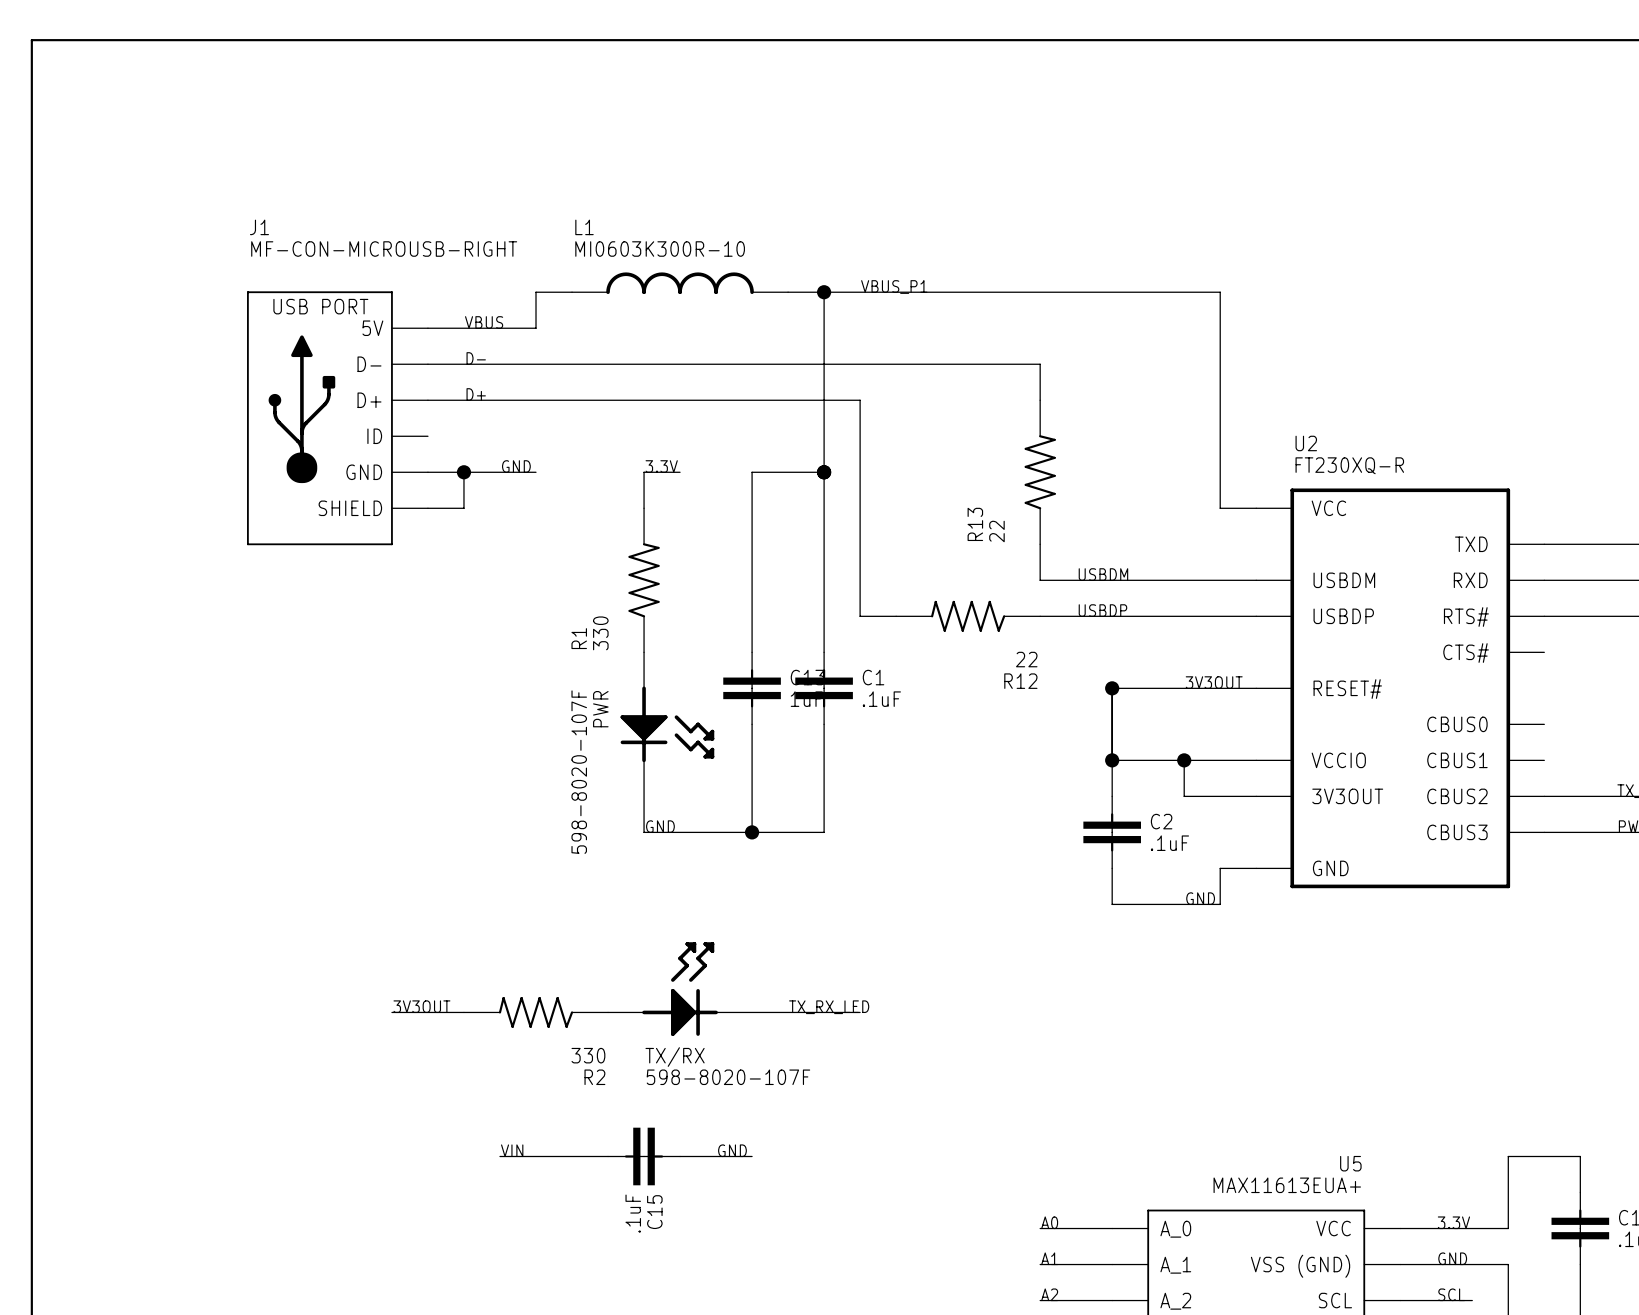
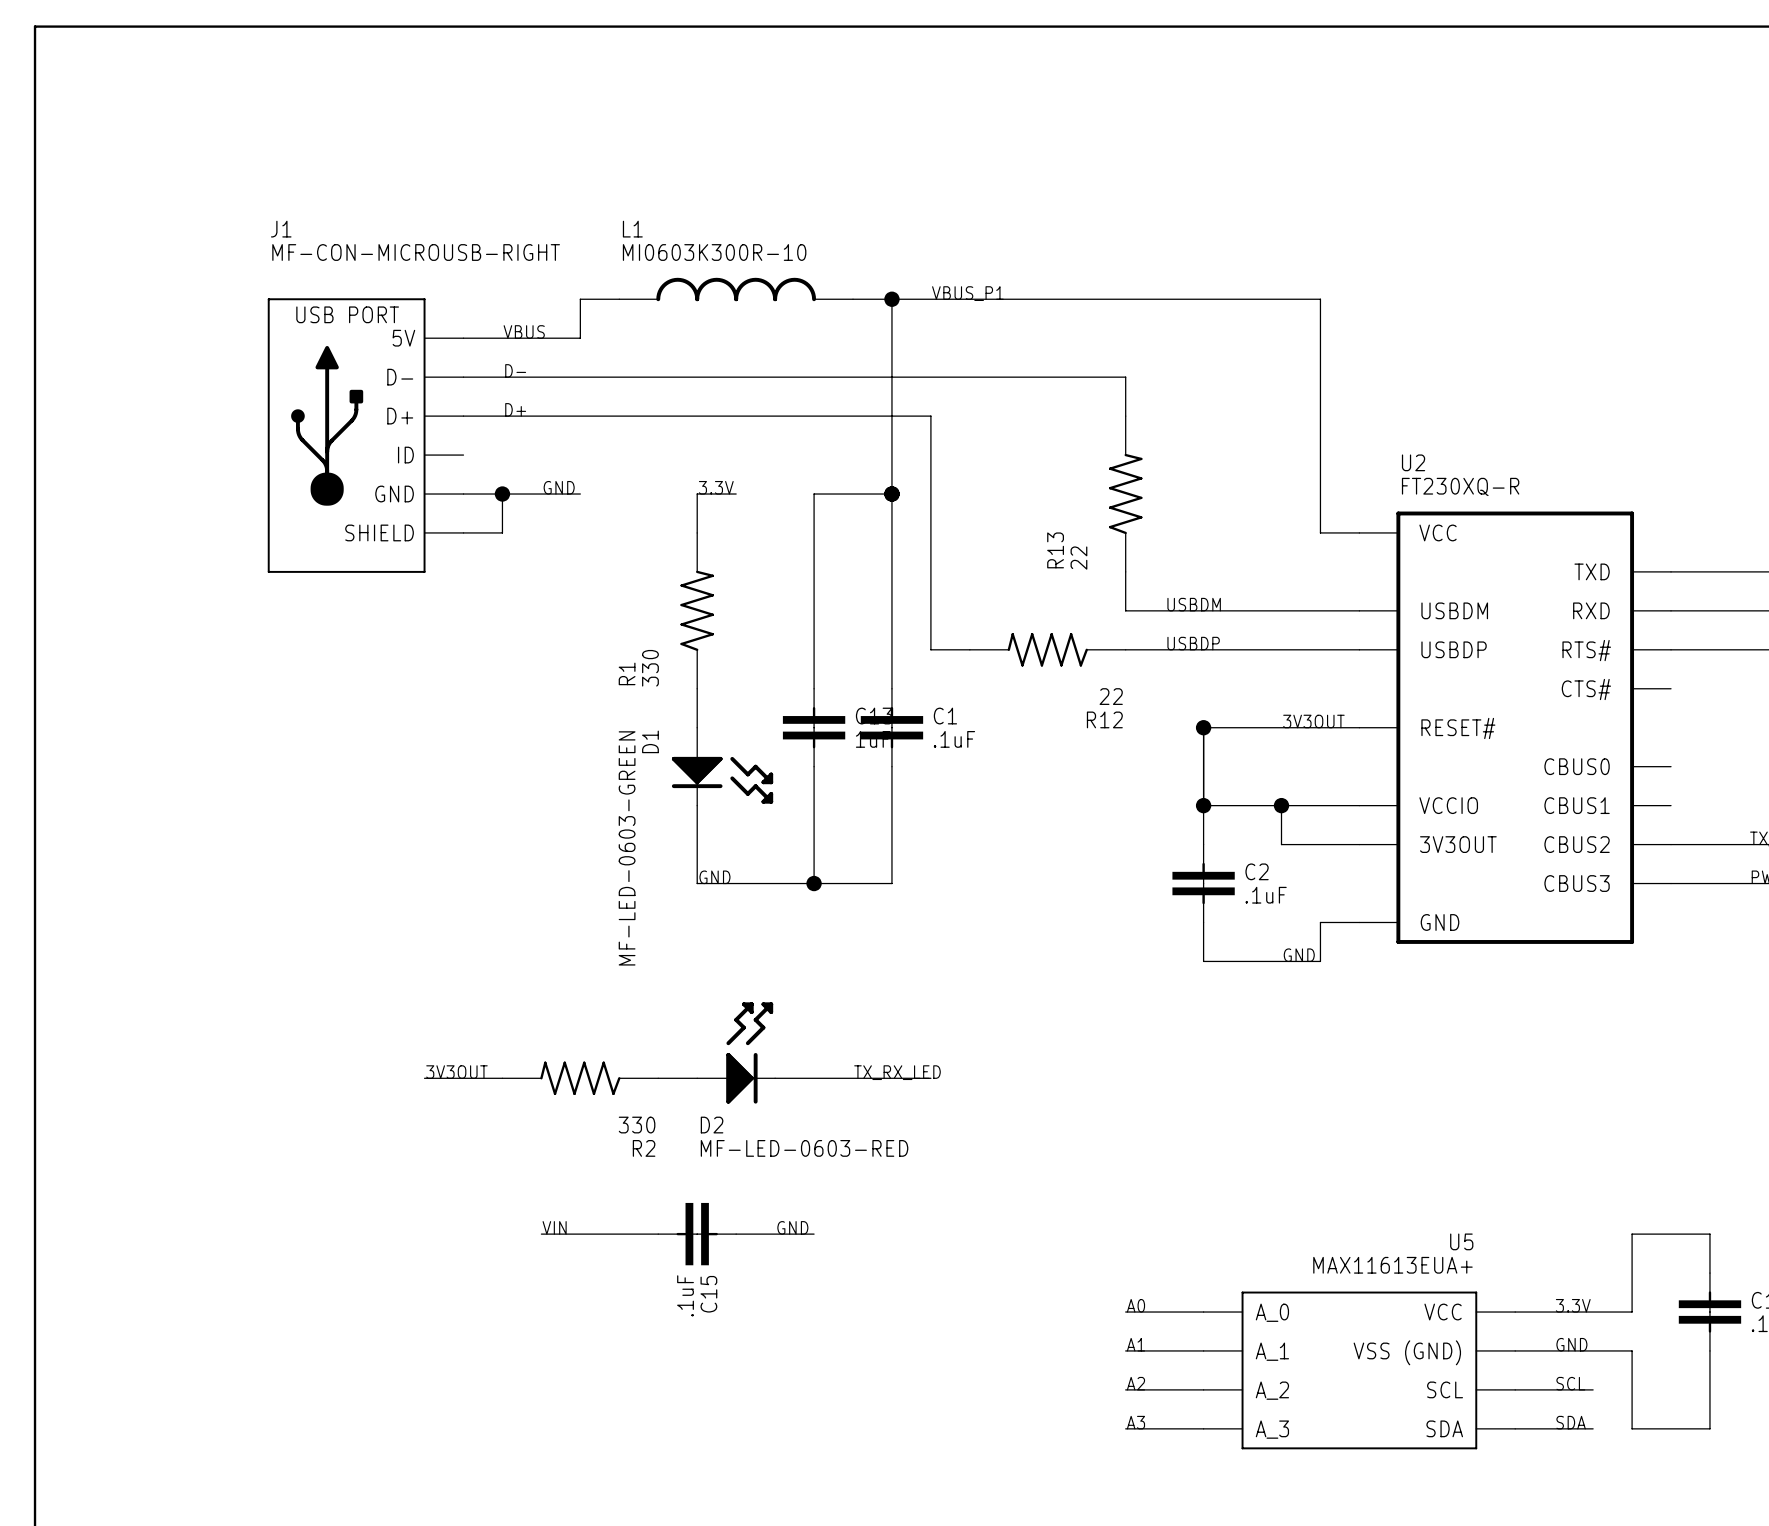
PWR: 598-8020-107F (667, 724) -> none
D1: none -> MF-LED-0603-GREEN (722, 766)
TX/RX: 598-8020-107F (680, 989) -> none
D2: none -> MF-LED-0603-RED (736, 1052)

